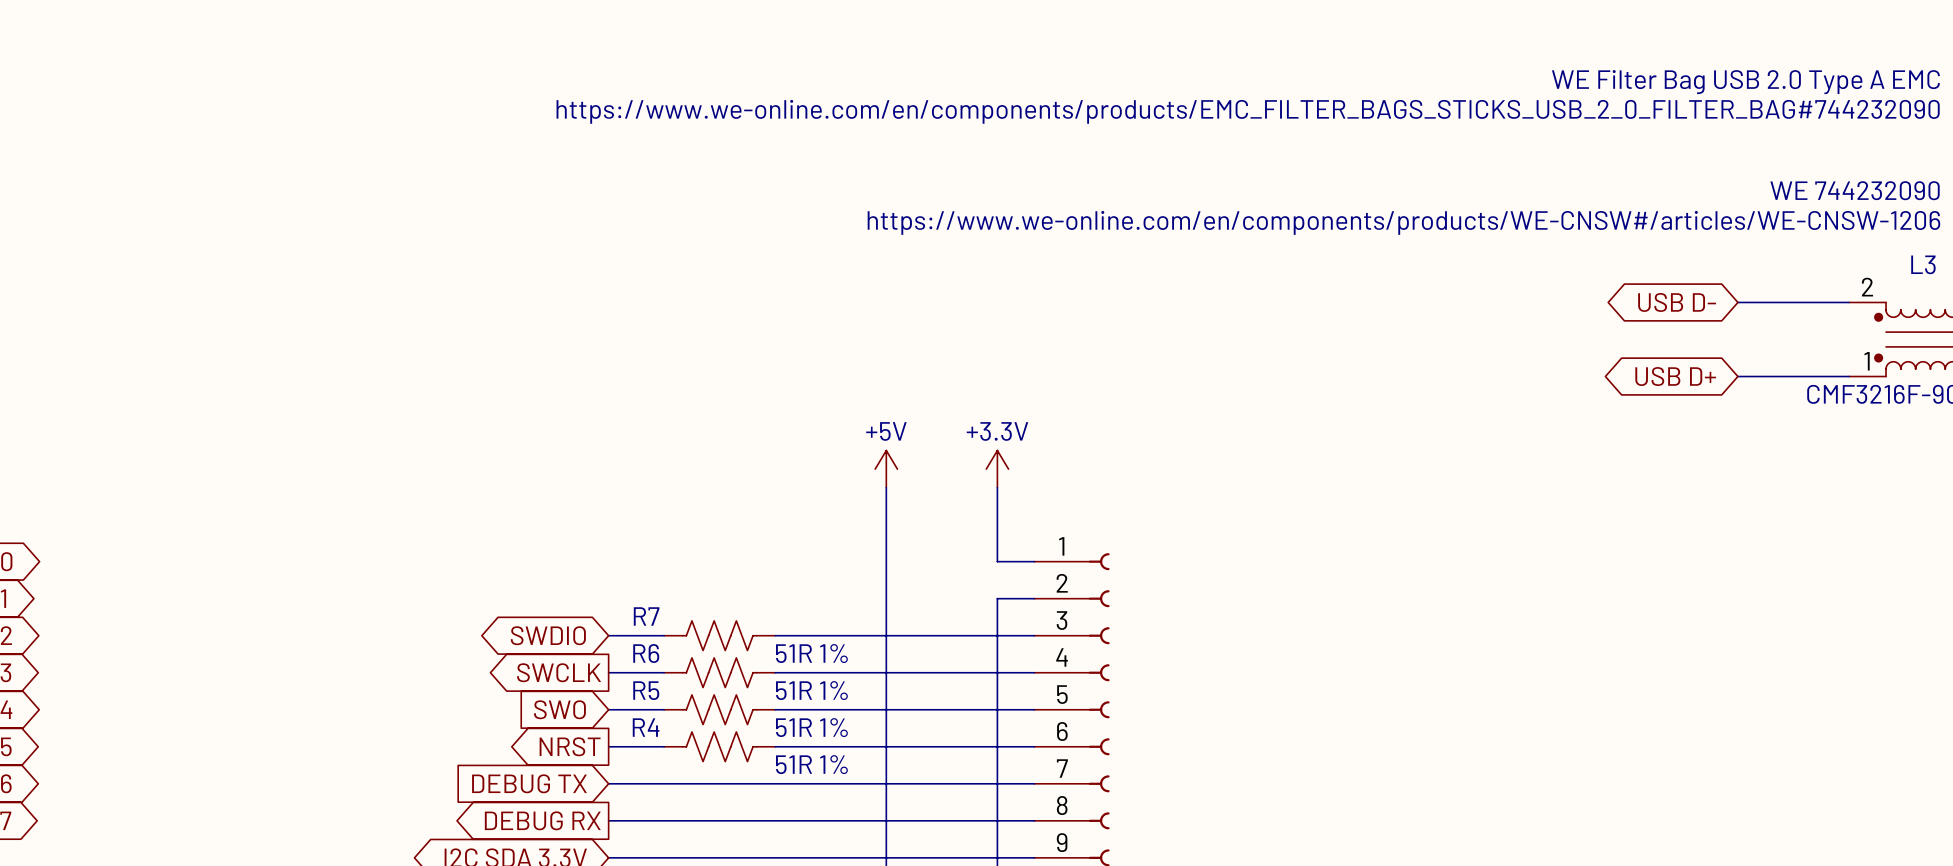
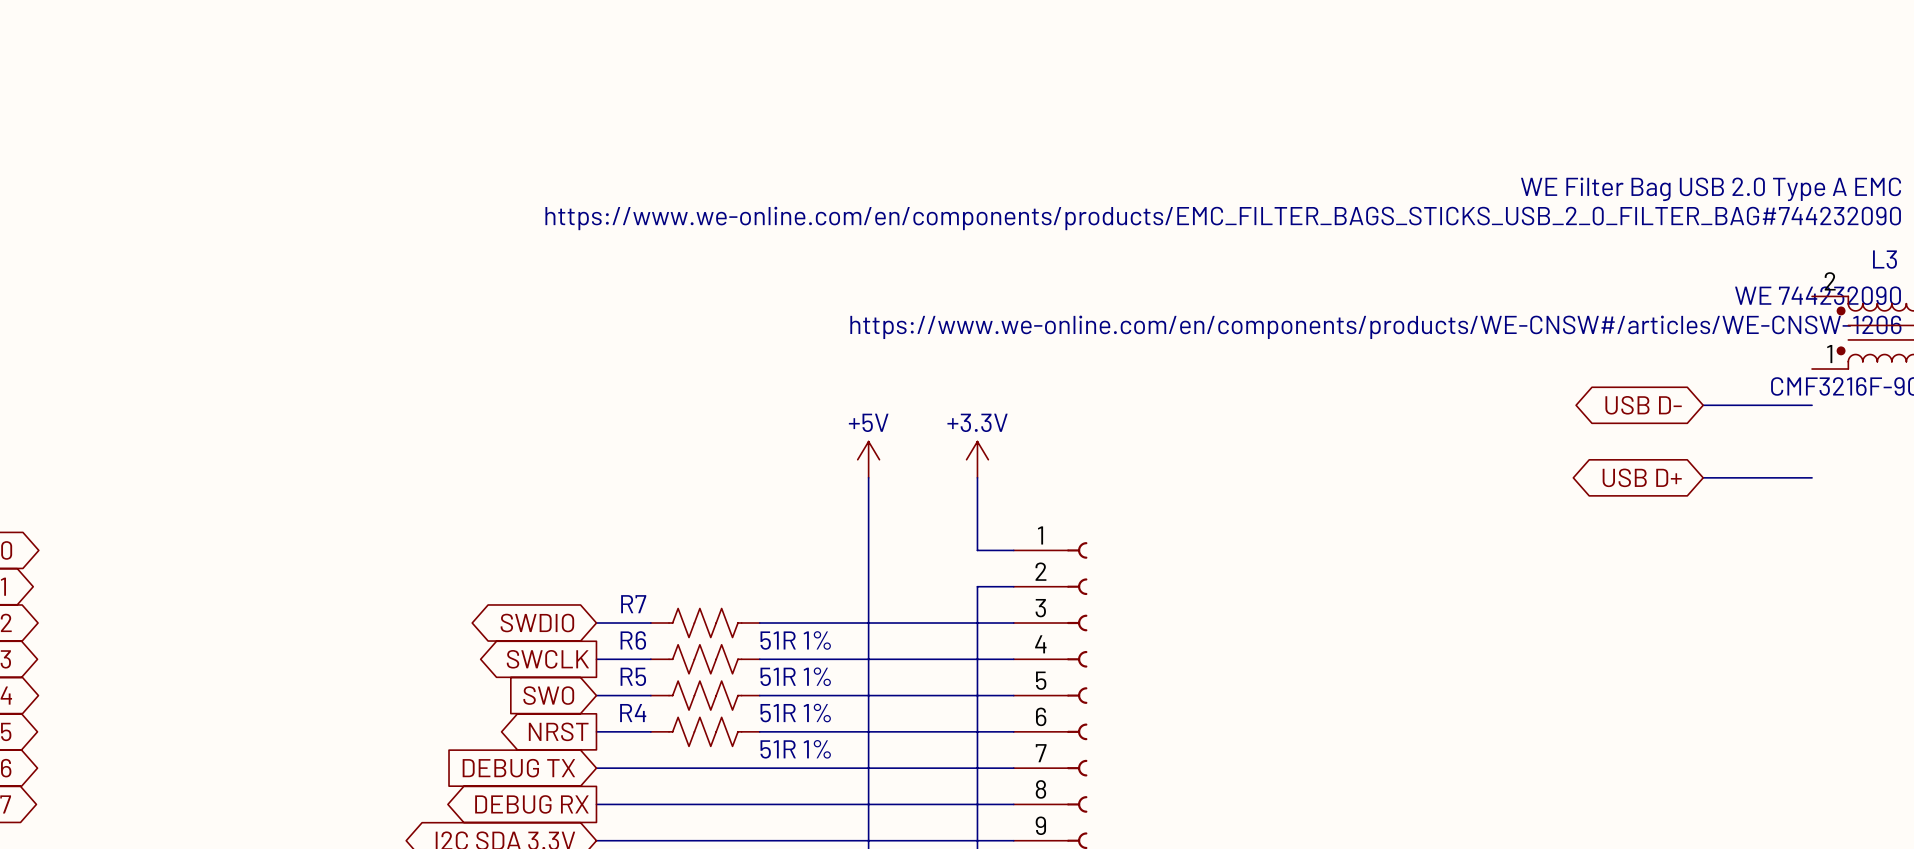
text: WE Filter Bag USB 2.0 Type A EMC (1745, 82) -> none
text: https://www.we-online.com/en/components/products/EMC_FILTER_BAGS_STICKS_USB_2_0_FILTER_BAG#744232090 (1248, 111) -> none
text: WE 744232090 (1855, 190) -> WE Filter Bag USB 2.0 Type A EMC (1711, 189)
text: https://www.we-online.com/en/components/products/WE-CNSW#/articles/WE-CNSW-1206 (1403, 222) -> https://www.we-online.com/en/components/products/EMC_FILTER_BAGS_STICKS_USB_2_0_FILTER_BAG#744232090 (1223, 218)
text: none -> WE 744232090 (1818, 295)
global label position: USB D- (1677, 302) -> USB D- (1643, 405)
wire: (1737, 302) (1848, 302) -> (1703, 405) (1812, 405)
text: none -> https://www.we-online.com/en/components/products/WE-CNSW#/articles/WE-CNSW-1206 (1375, 327)
global label position: USB D+ (1675, 376) -> USB D+ (1642, 477)
wire: (1737, 376) (1848, 376) -> (1703, 477) (1812, 477)

